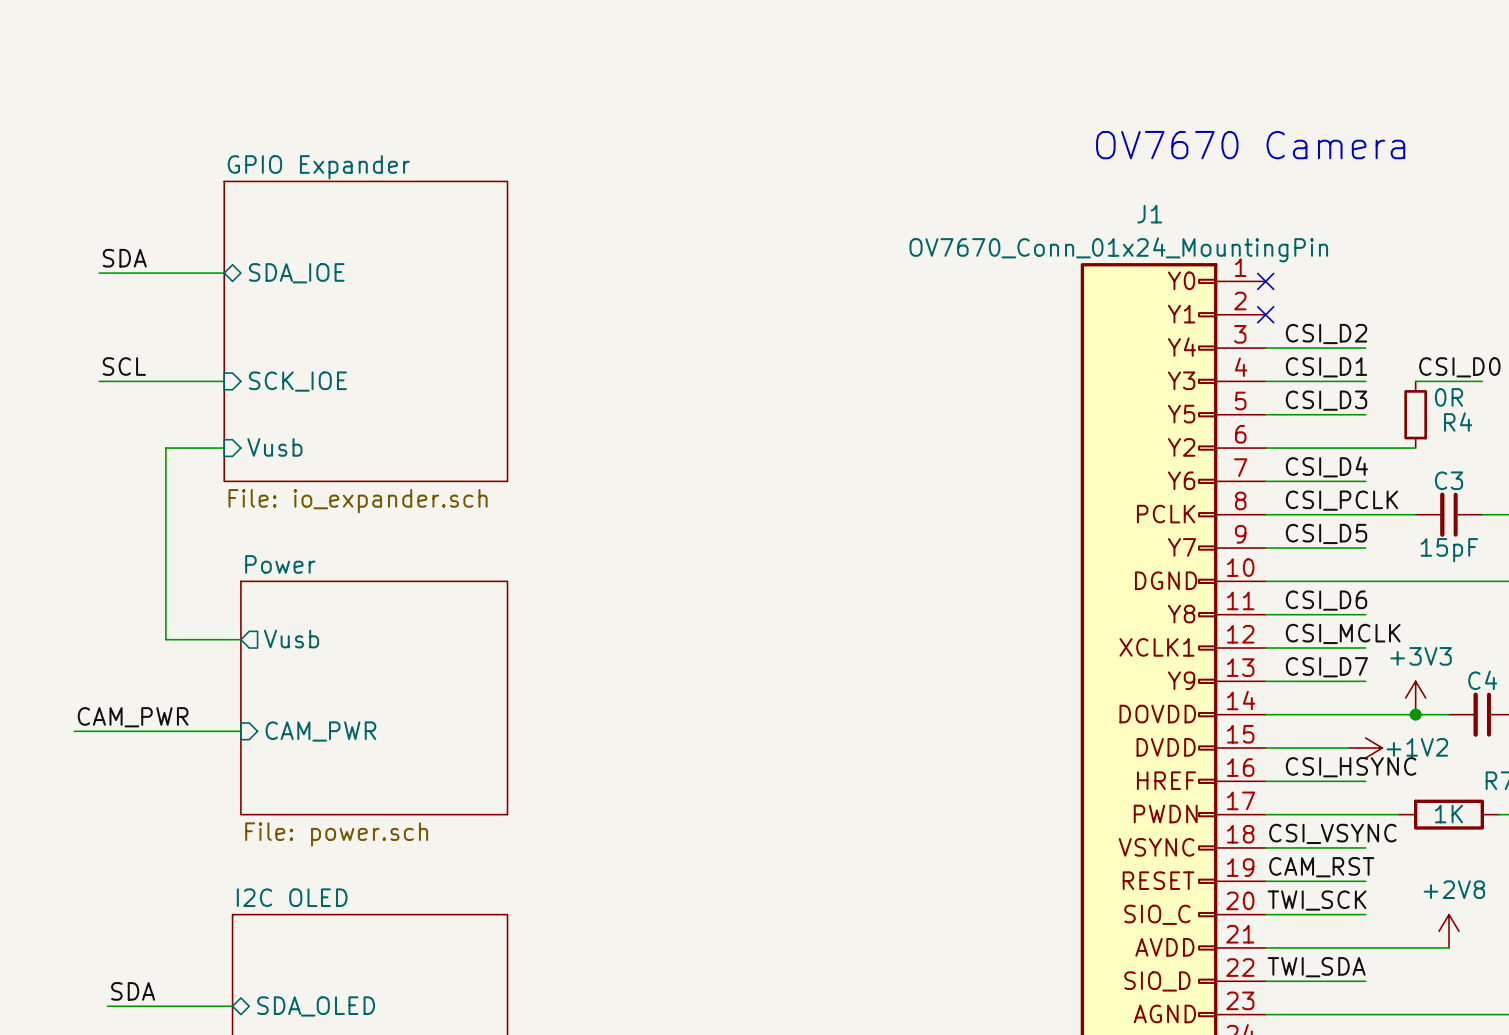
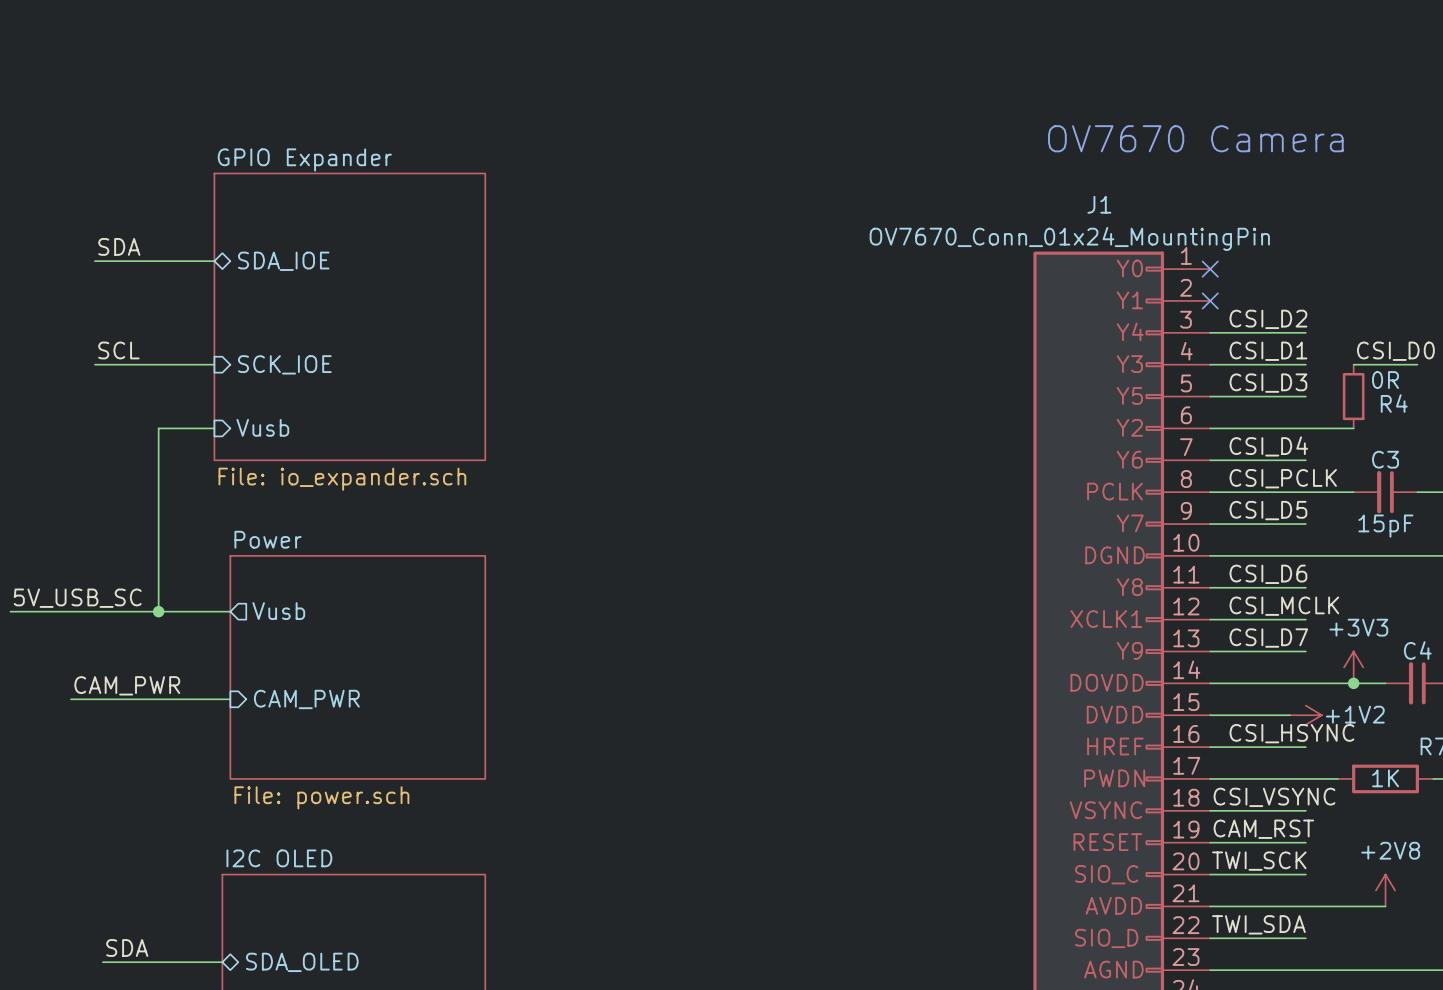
label: none -> 5V_USB_SC (77, 598)
wire: none -> (10, 611) (158, 611)
junction: none -> (158, 611)

